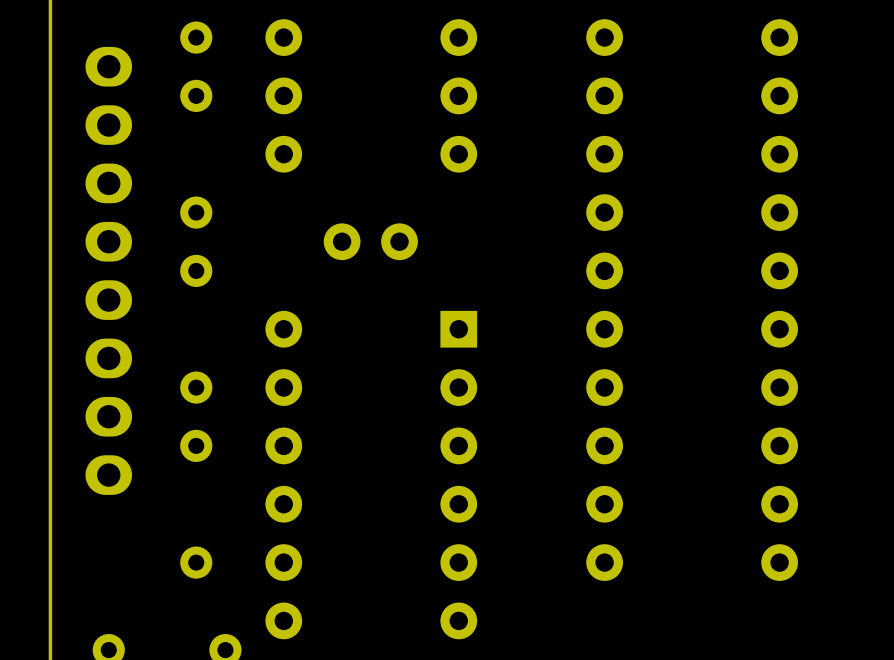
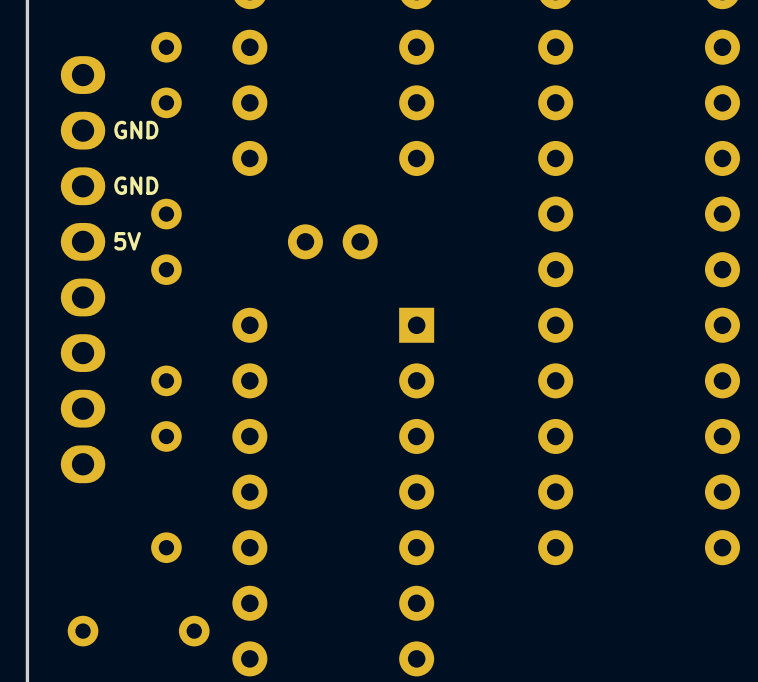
text: none -> GND (136, 130)
text: none -> GND (136, 185)
text: none -> 5V (127, 241)

